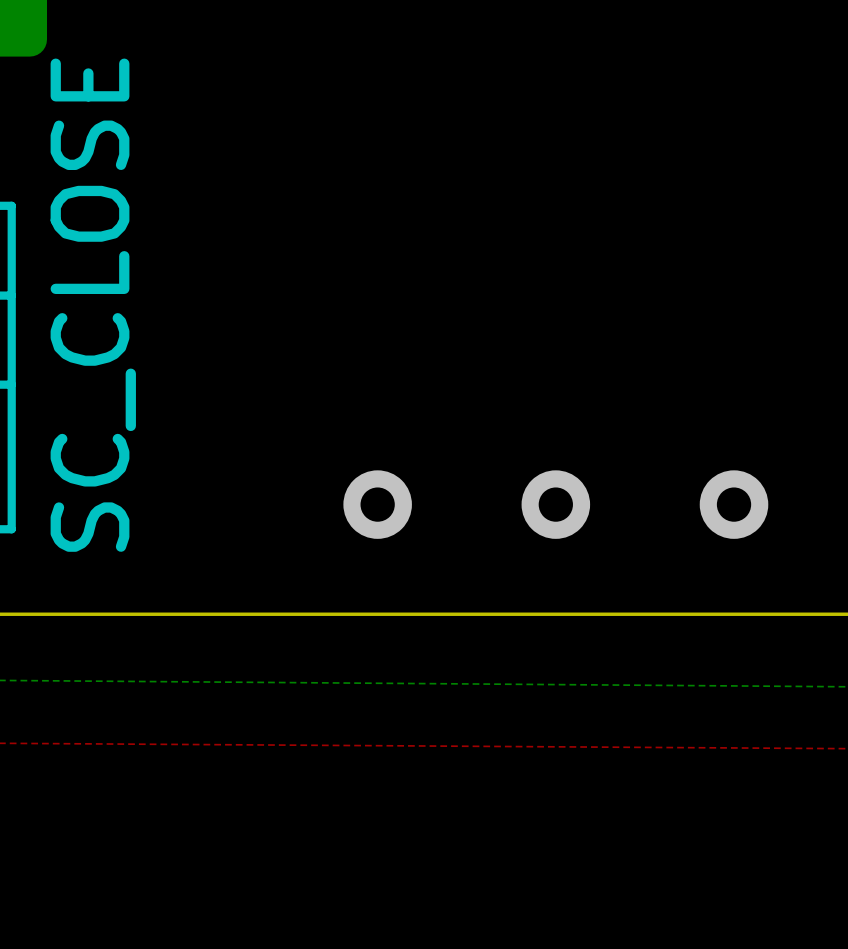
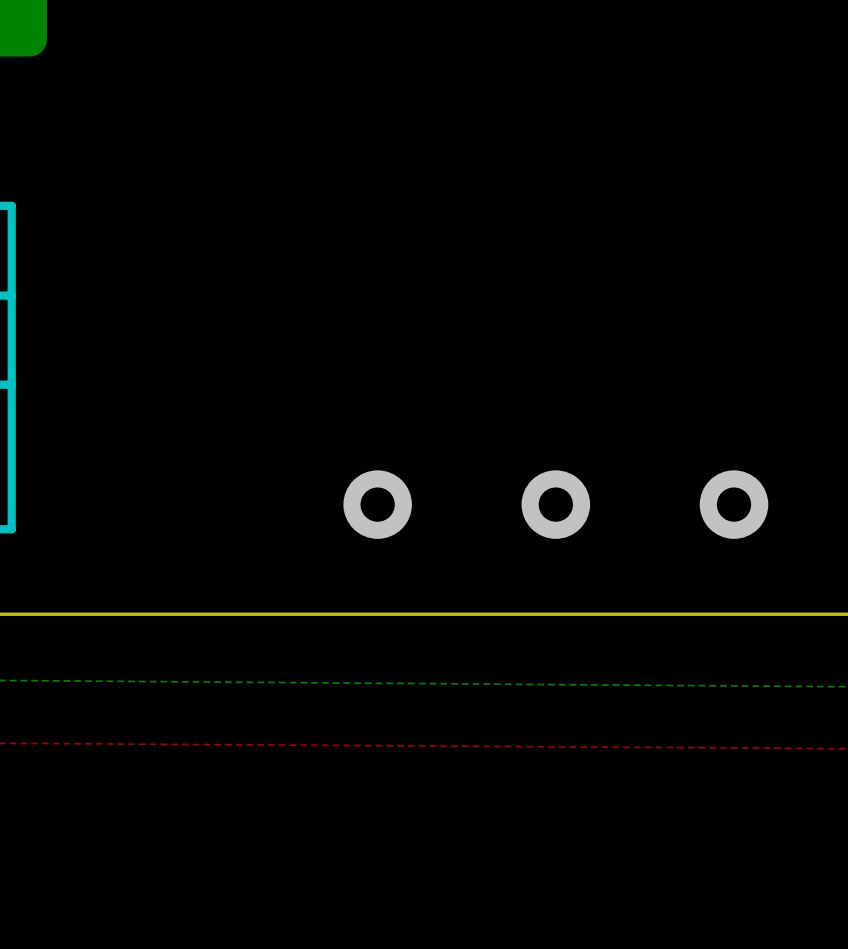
part value: SC_CLOSE (93, 305) -> none

